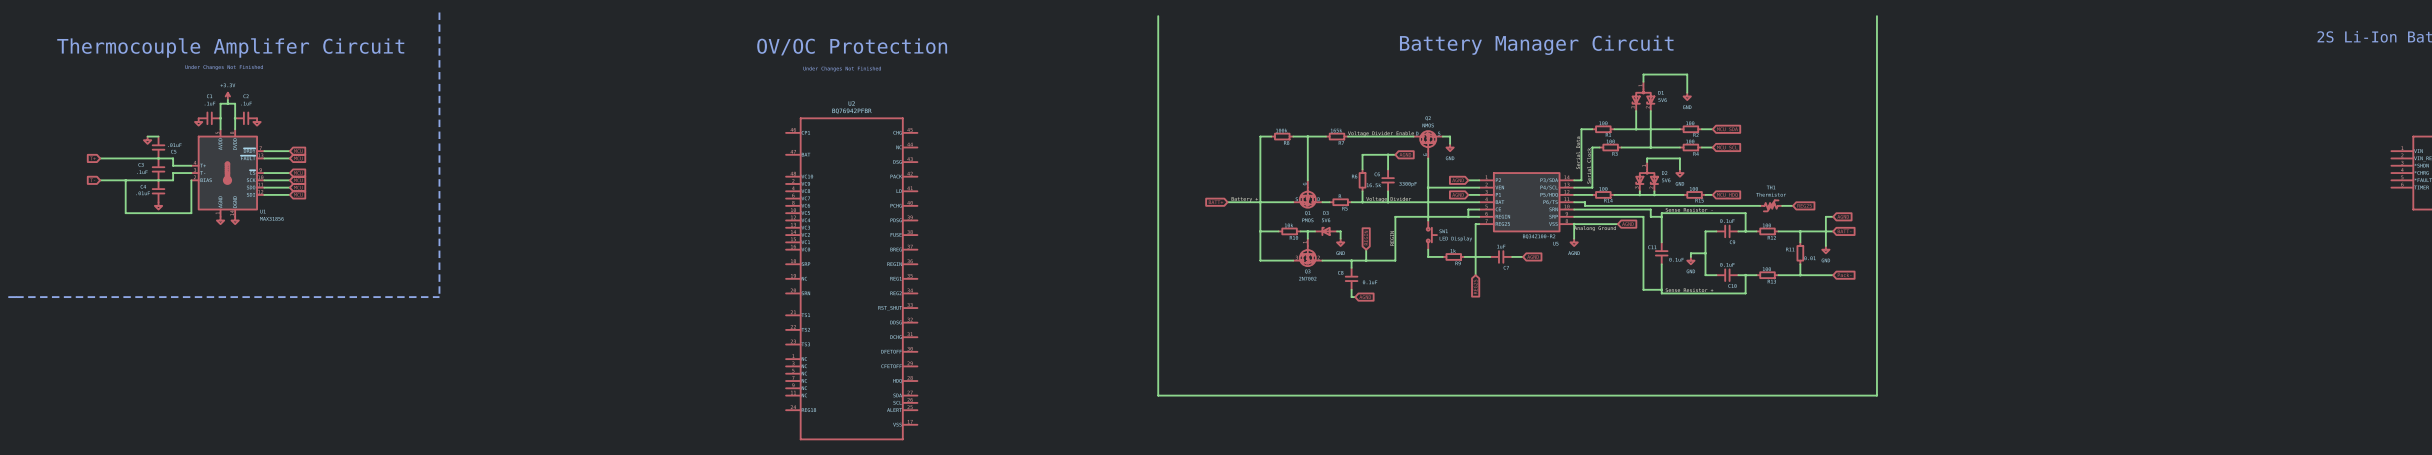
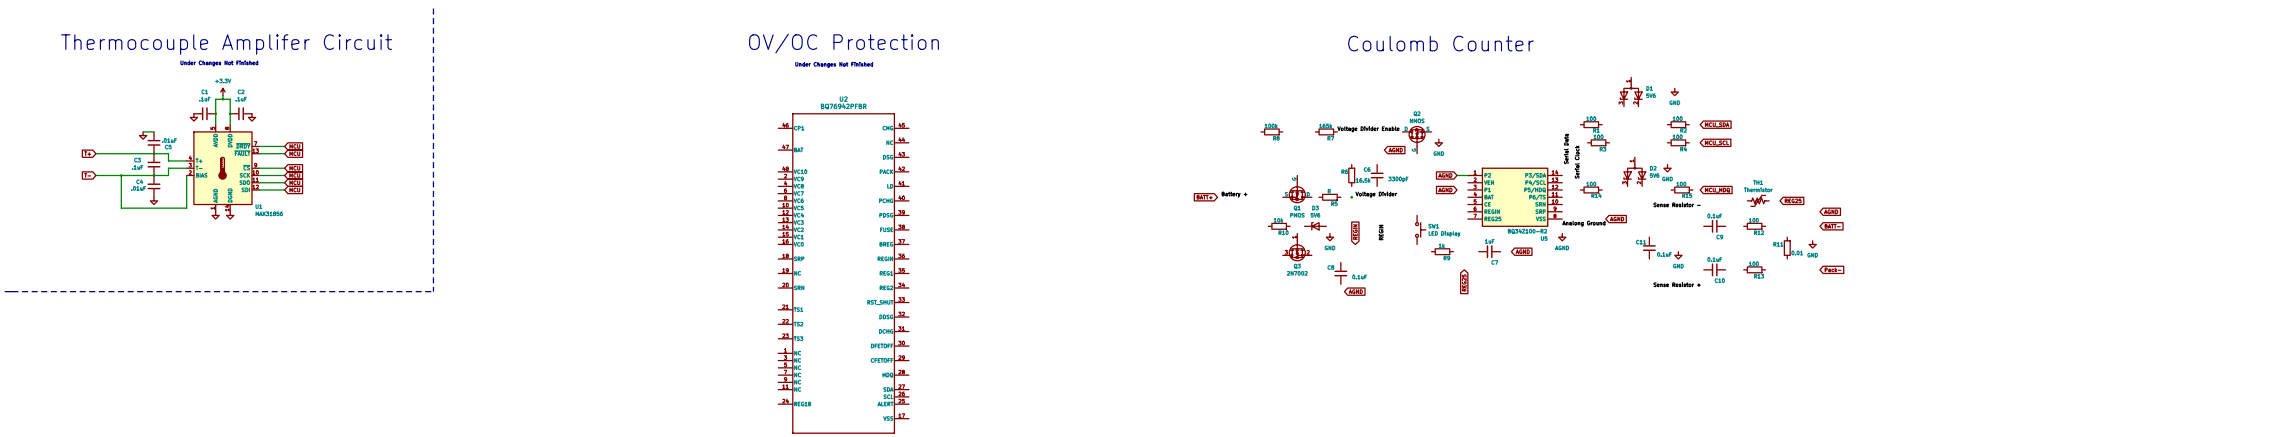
wire: (1158, 16) (1158, 395) (1876, 395) (1876, 16) -> none
text: Battery Manager Circuit (1536, 45) -> none
text: none -> Coulomb Counter (1440, 43)
wire: (1643, 81) (1643, 74) (1687, 74) (1687, 92) -> none
wire: (1636, 111) (1636, 129) -> none
wire: (1650, 111) (1650, 147) -> none
wire: (1592, 129) (1581, 129) (1581, 180) (1574, 180) -> none
wire: (1614, 129) (1679, 129) -> none
wire: (1701, 129) (1712, 129) -> none
wire: (1271, 136) (1260, 136) (1260, 260) (1293, 260) -> none
wire: (1293, 136) (1326, 136) -> none
wire: (1307, 136) (1307, 180) -> none
wire: (1347, 136) (1413, 136) -> none
wire: (1442, 136) (1450, 136) (1450, 143) -> none
wire: (1599, 147) (1592, 147) (1592, 187) (1574, 187) -> none
wire: (1621, 147) (1679, 147) -> none
wire: (1701, 147) (1712, 147) -> none
wire: (1388, 154) (1388, 169) -> none
wire: (1395, 154) (1362, 154) (1362, 169) -> none
wire: (1428, 158) (1428, 220) -> none
wire: (1647, 162) (1647, 158) (1679, 158) (1679, 169) -> none
wire: (1428, 187) (1479, 187) -> none
wire: (1362, 191) (1362, 202) -> none
wire: (1388, 191) (1388, 202) -> none
wire: (1639, 191) (1639, 194) -> none
wire: (1654, 191) (1654, 194) -> none
wire: (1468, 194) (1479, 194) -> none
wire: (1574, 194) (1592, 194) -> none
wire: (1614, 194) (1683, 194) -> none
wire: (1705, 194) (1712, 194) -> none
wire: (1227, 202) (1293, 202) -> none
wire: (1322, 202) (1329, 202) -> none
wire: (1351, 202) (1479, 202) -> none
wire: (1574, 202) (1585, 202) (1585, 205) (1760, 205) -> none
wire: (1782, 205) (1793, 205) -> none
wire: (1479, 209) (1468, 209) (1468, 216) -> none
wire: (1574, 209) (1650, 209) (1650, 216) (1661, 216) -> none
wire: (1479, 216) (1395, 216) (1395, 260) (1322, 260) -> none
wire: (1574, 216) (1643, 216) (1643, 289) (1661, 289) -> none
wire: (1833, 216) (1825, 216) (1825, 246) -> none
wire: (1479, 224) (1475, 224) (1475, 275) -> none
wire: (1617, 224) (1574, 224) (1574, 238) -> none
wire: (1260, 231) (1278, 231) -> none
wire: (1300, 231) (1315, 231) -> none
wire: (1307, 231) (1307, 238) -> none
wire: (1336, 231) (1340, 231) (1340, 238) -> none
wire: (1716, 231) (1705, 231) (1705, 275) (1716, 275) -> none
wire: (1738, 231) (1756, 231) -> none
wire: (1745, 231) (1745, 213) (1661, 213) (1661, 242) -> none
wire: (1778, 231) (1833, 231) -> none
wire: (1800, 231) (1800, 242) -> none
wire: (1366, 249) (1366, 260) -> none
wire: (1428, 249) (1428, 256) (1442, 256) -> none
wire: (1705, 253) (1690, 253) (1690, 256) -> none
wire: (1464, 256) (1490, 256) -> none
wire: (1512, 256) (1523, 256) -> none
wire: (1351, 260) (1351, 267) -> none
wire: (1661, 264) (1661, 293) (1745, 293) (1745, 275) -> none
wire: (1800, 264) (1800, 275) -> none
wire: (1738, 275) (1756, 275) -> none
wire: (1778, 275) (1833, 275) -> none
wire: (1351, 289) (1351, 297) (1355, 297) -> none

